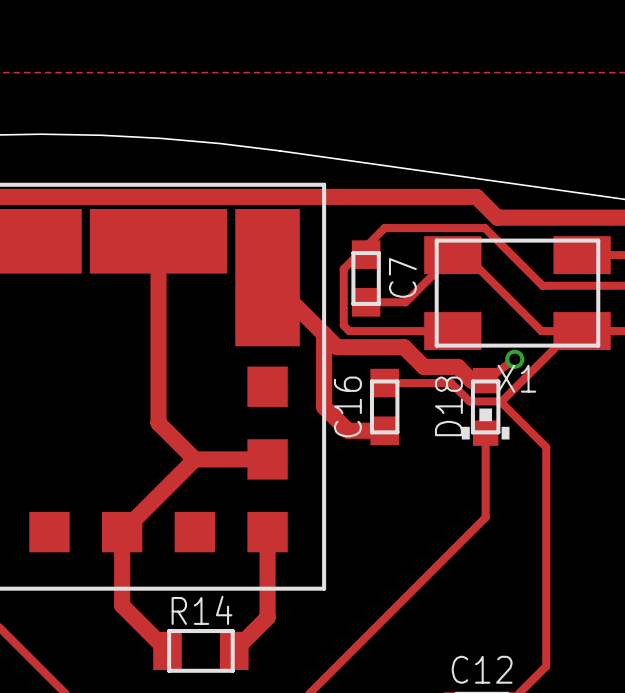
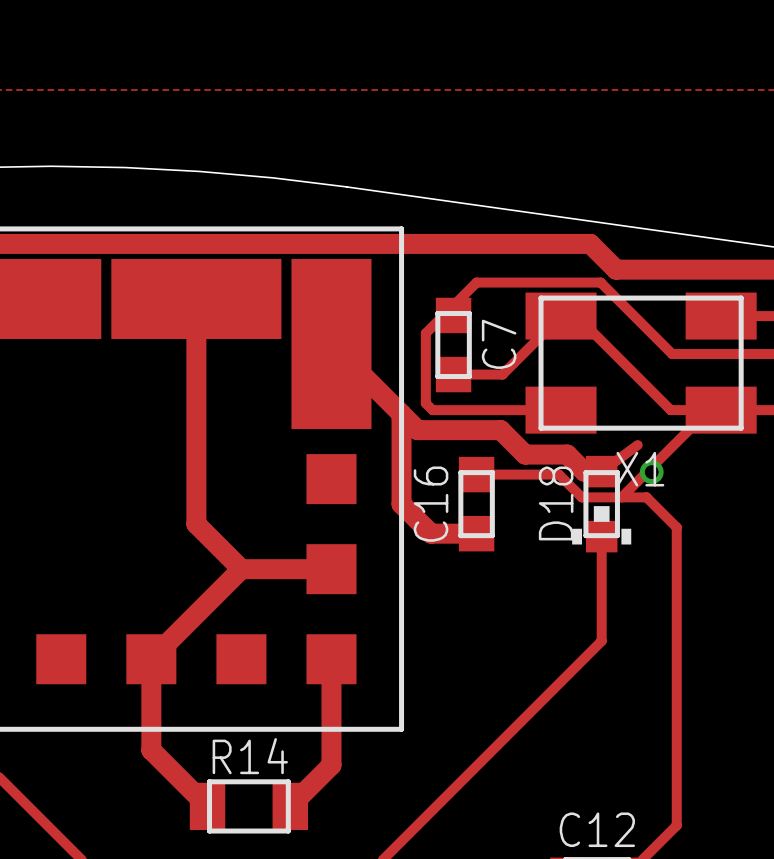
via position: (514, 359) -> (651, 472)
track: (500, 401) (546, 447) -> (621, 497) (646, 497) (676, 527) (676, 554)

